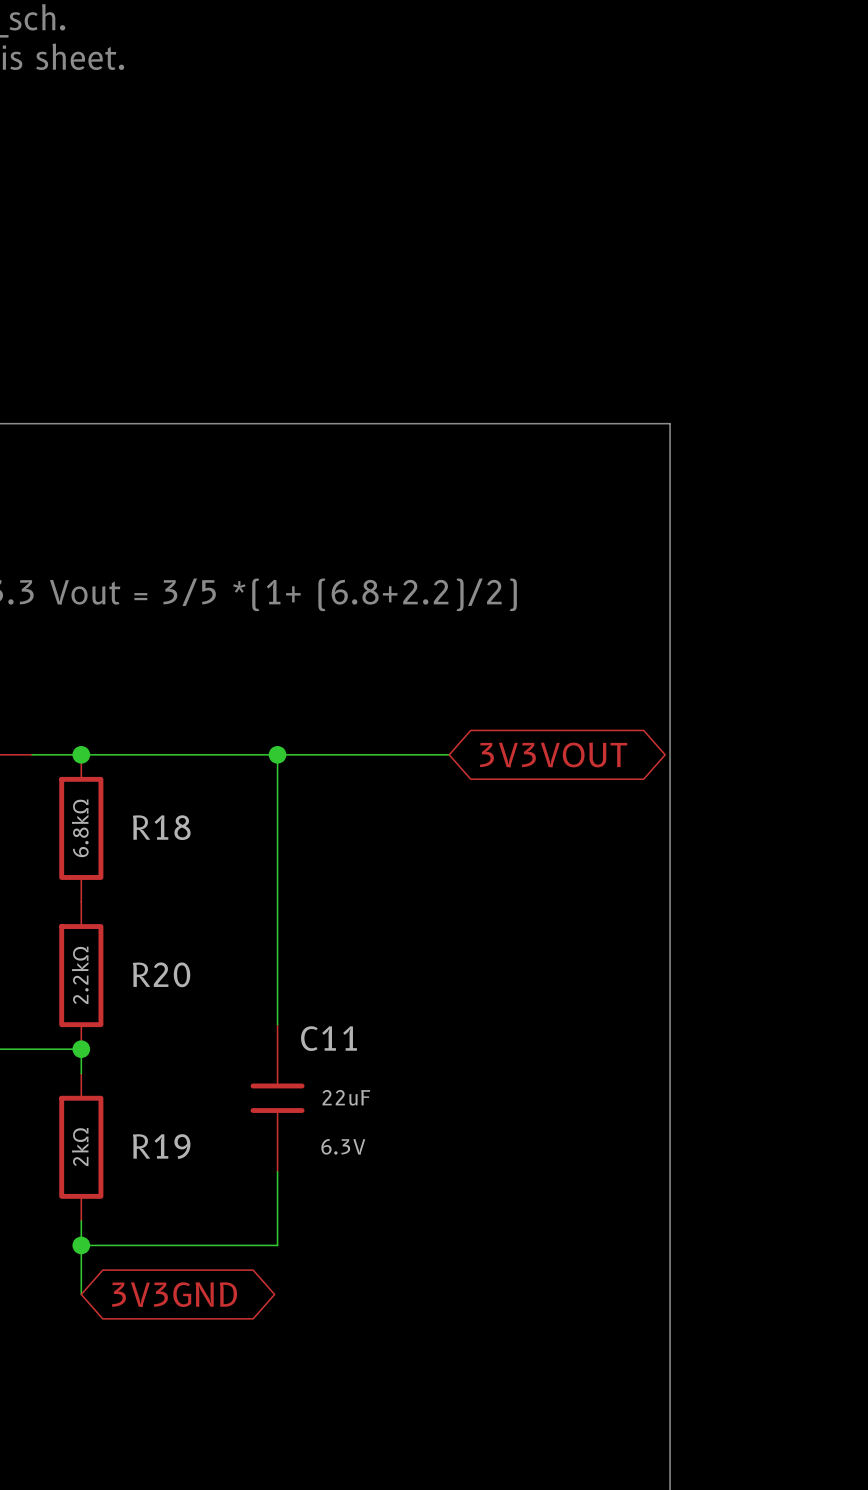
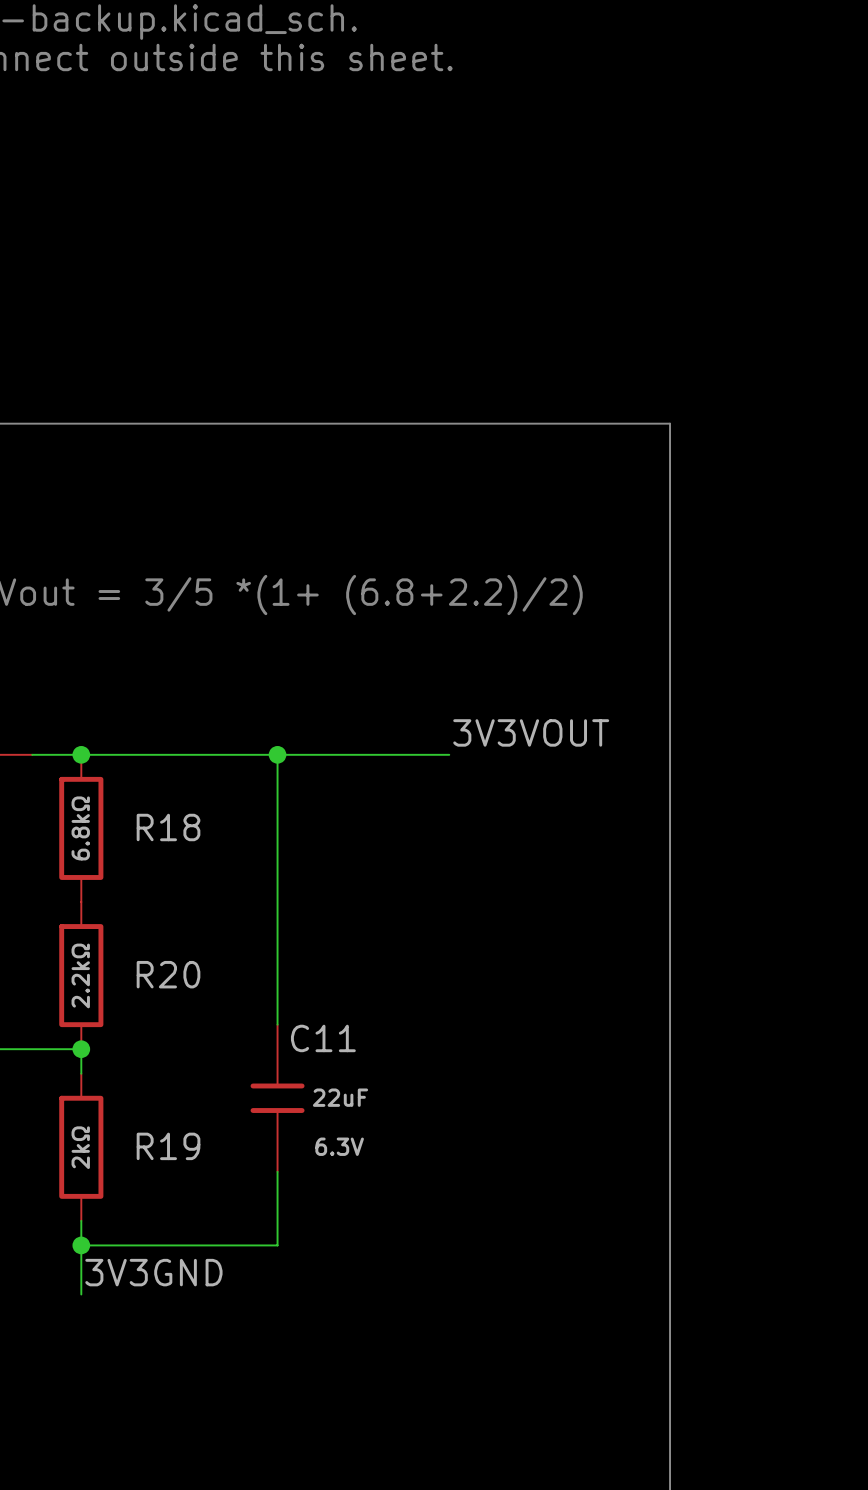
label: none -> 3V3VOUT (531, 732)
global label: 3V3VOUT (553, 754) -> none
label: none -> 3V3GND (153, 1272)
global label: 3V3GND (174, 1294) -> none

